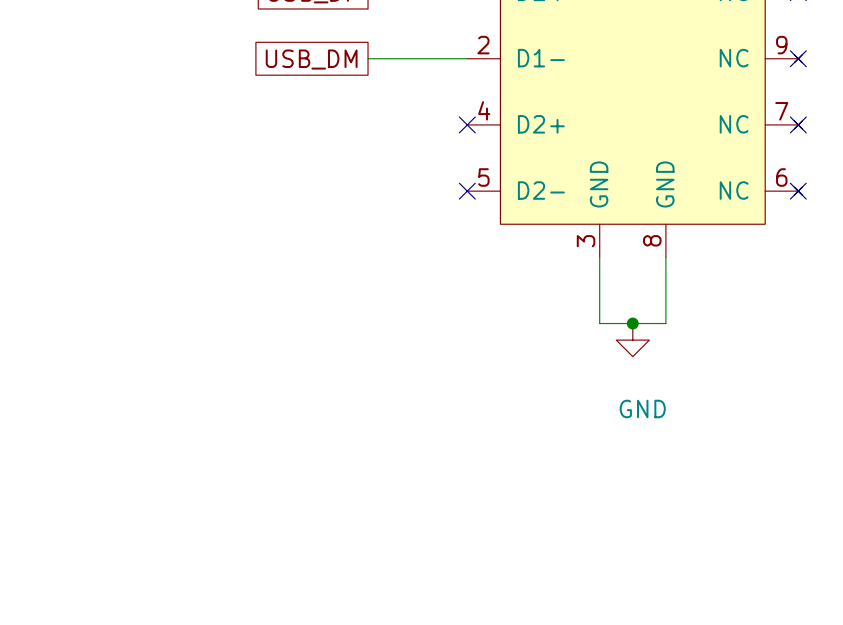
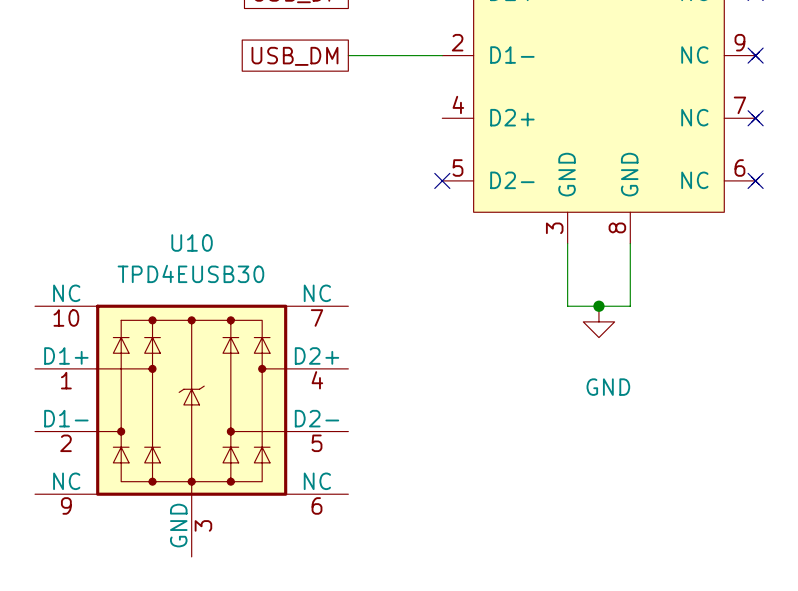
no-connect mark: (467, 124) -> none
U10: none -> TPD4EUSB30 (191, 430)

